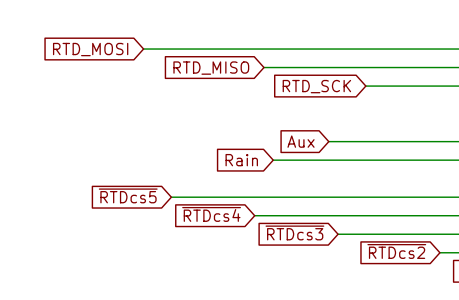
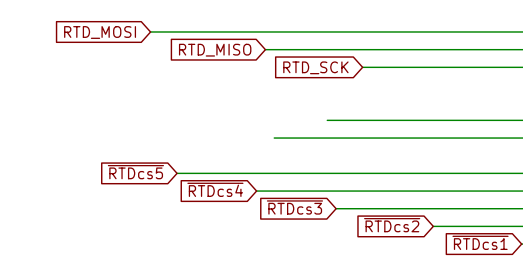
global label: Aux (301, 141) -> none
global label: Rain (241, 160) -> none

